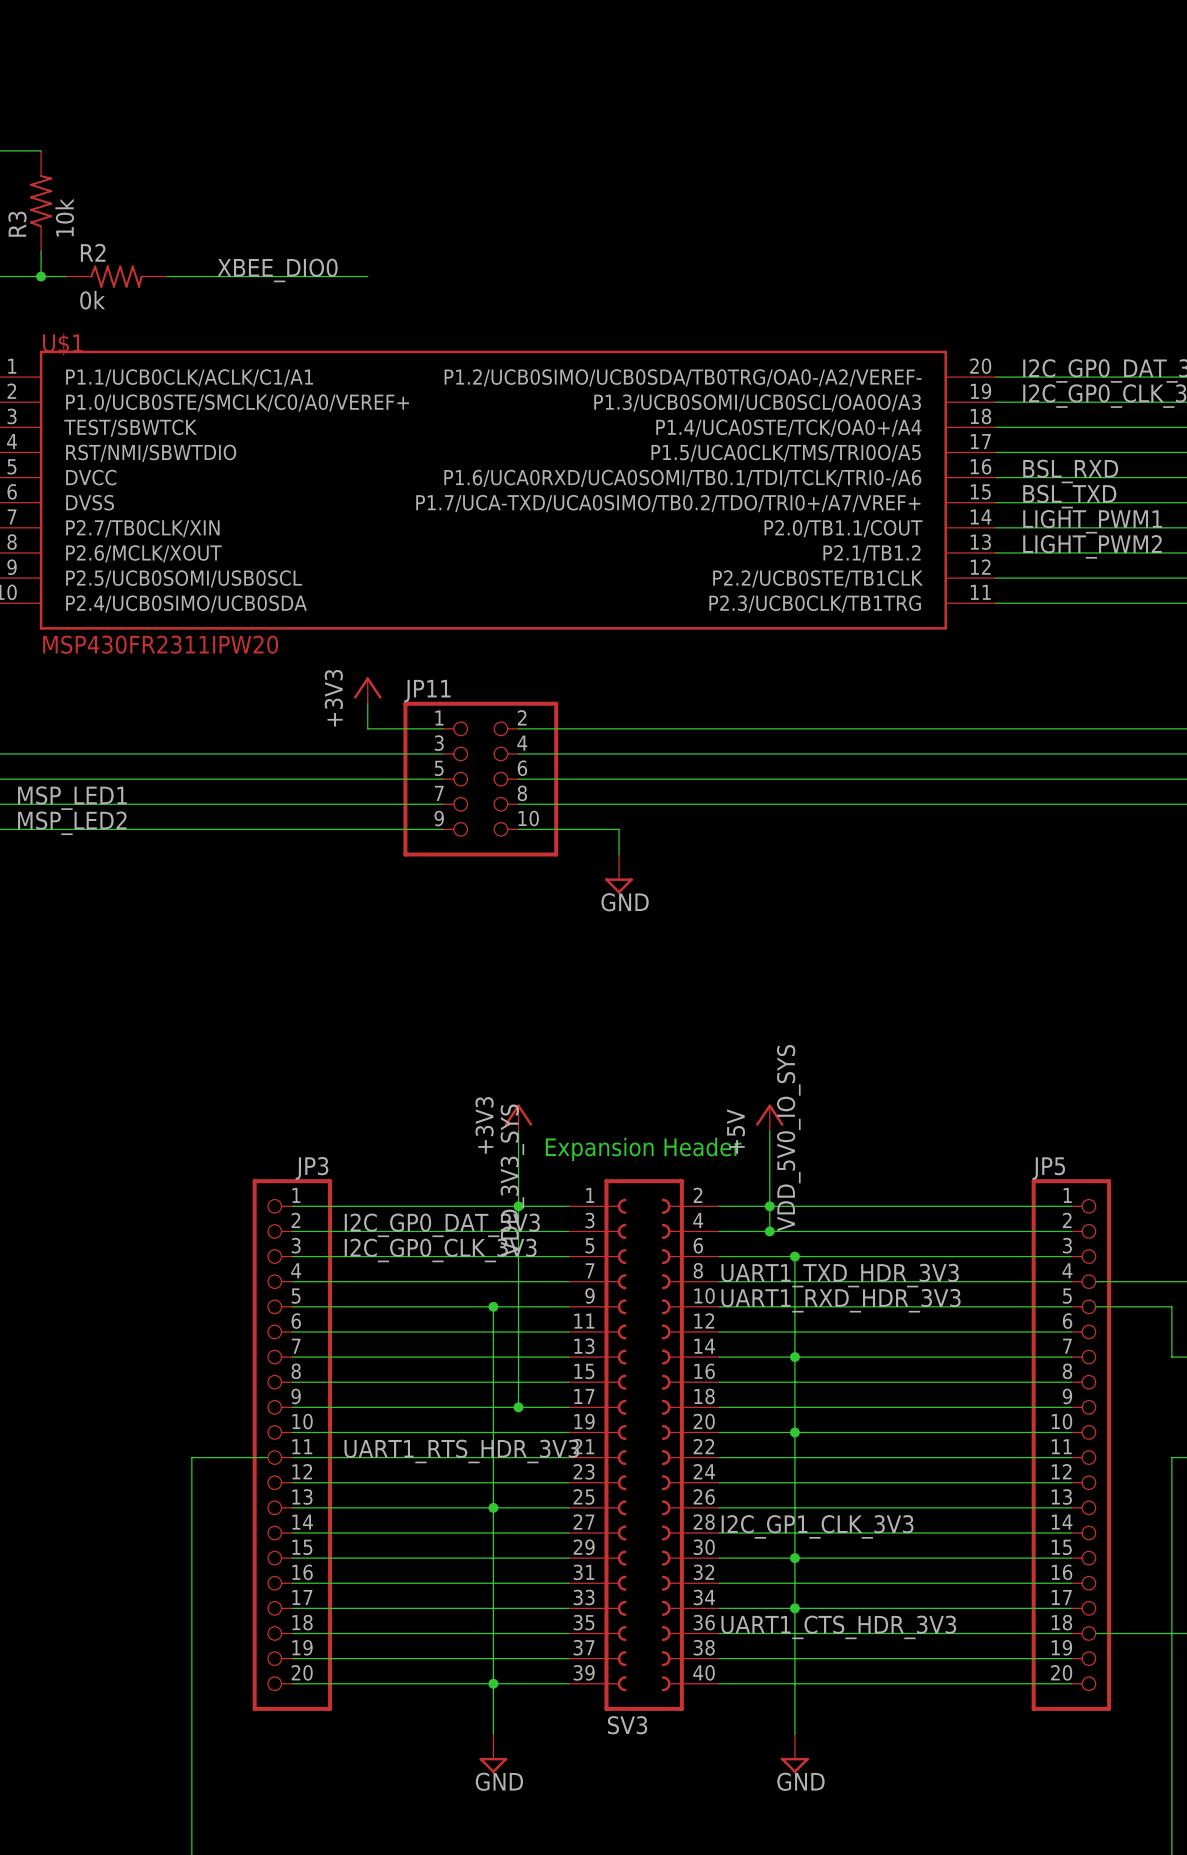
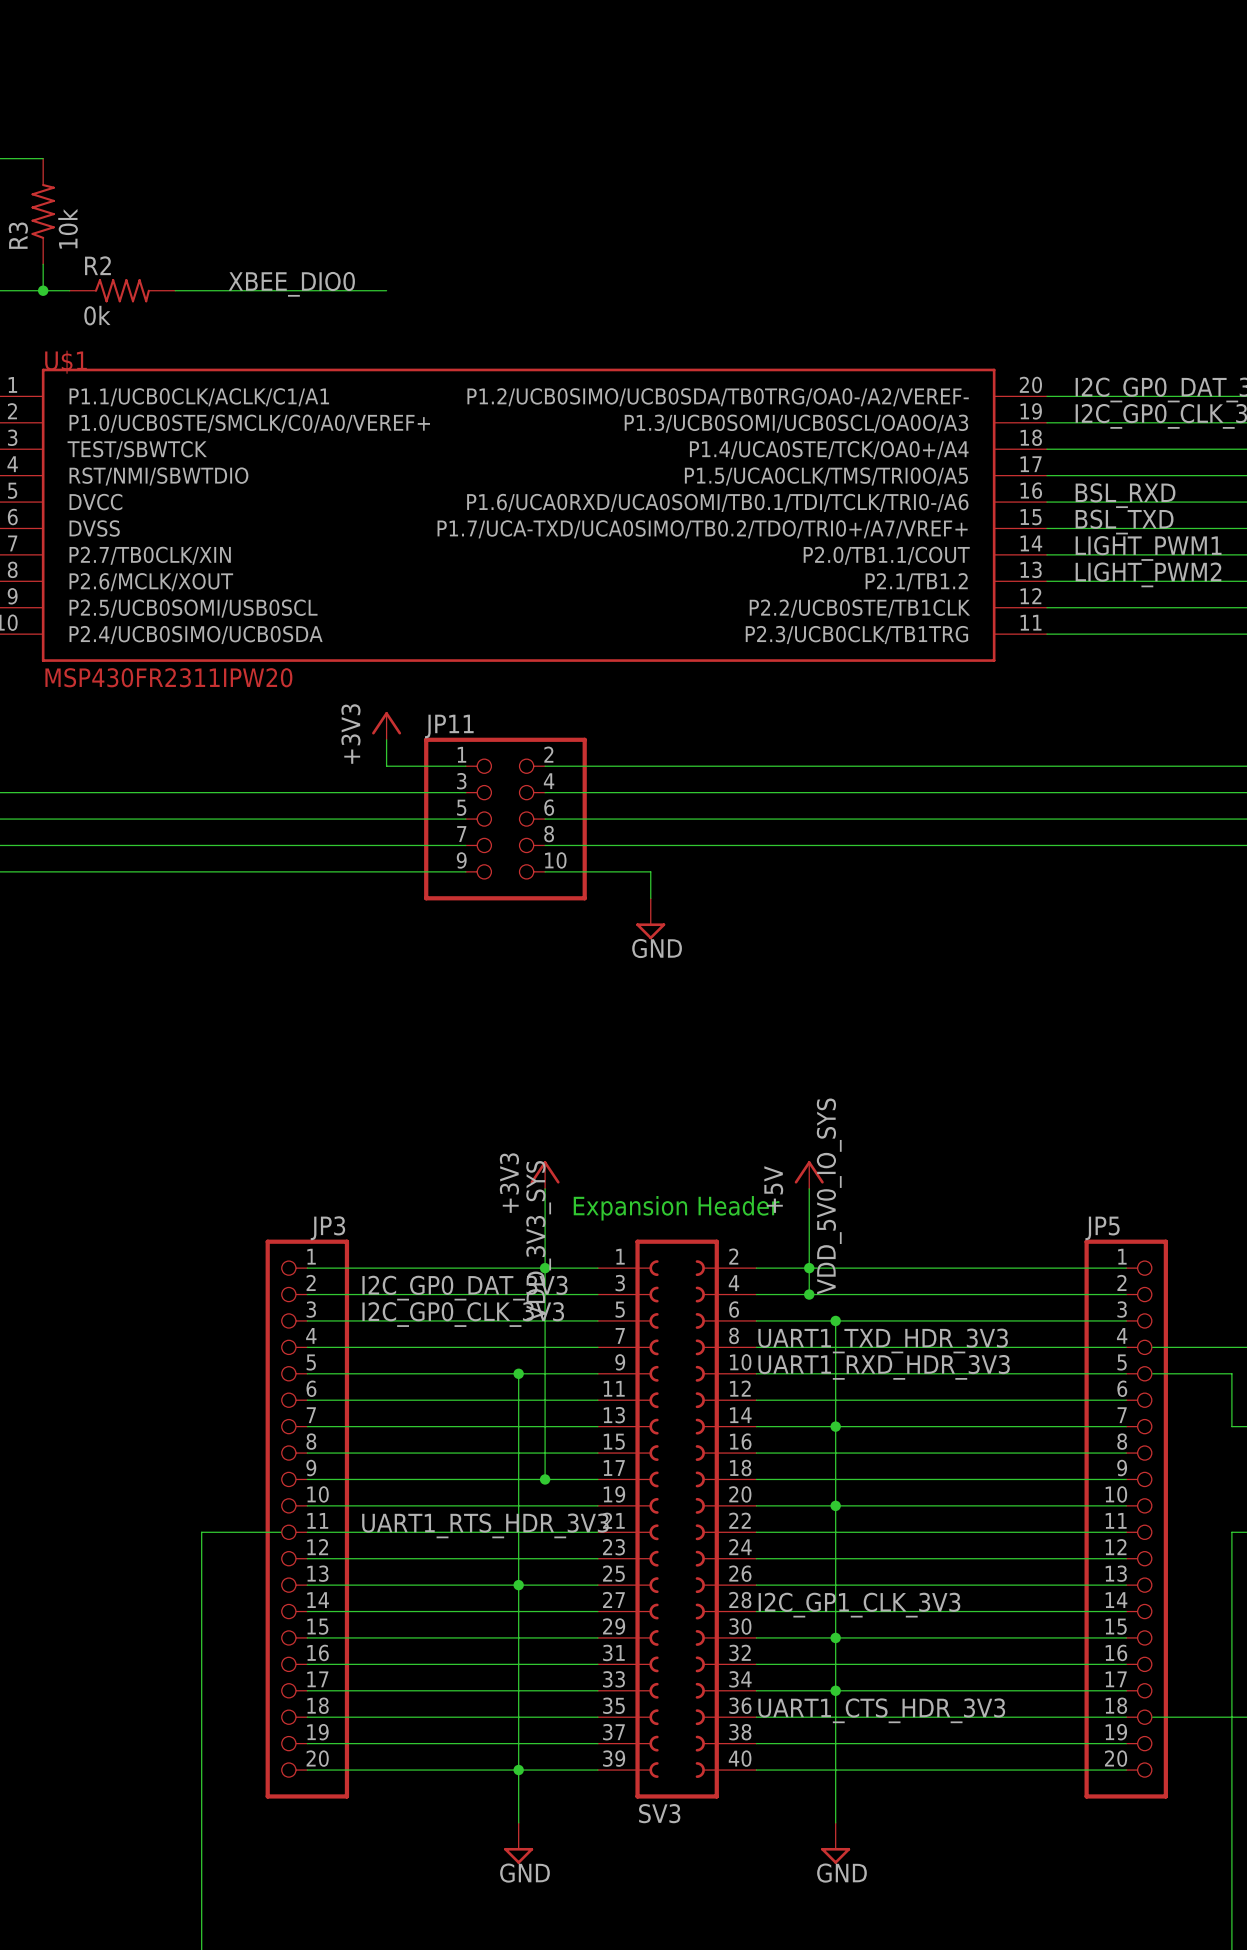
label: MSP_LED1 (72, 798) -> none
label: MSP_LED2 (72, 823) -> none

